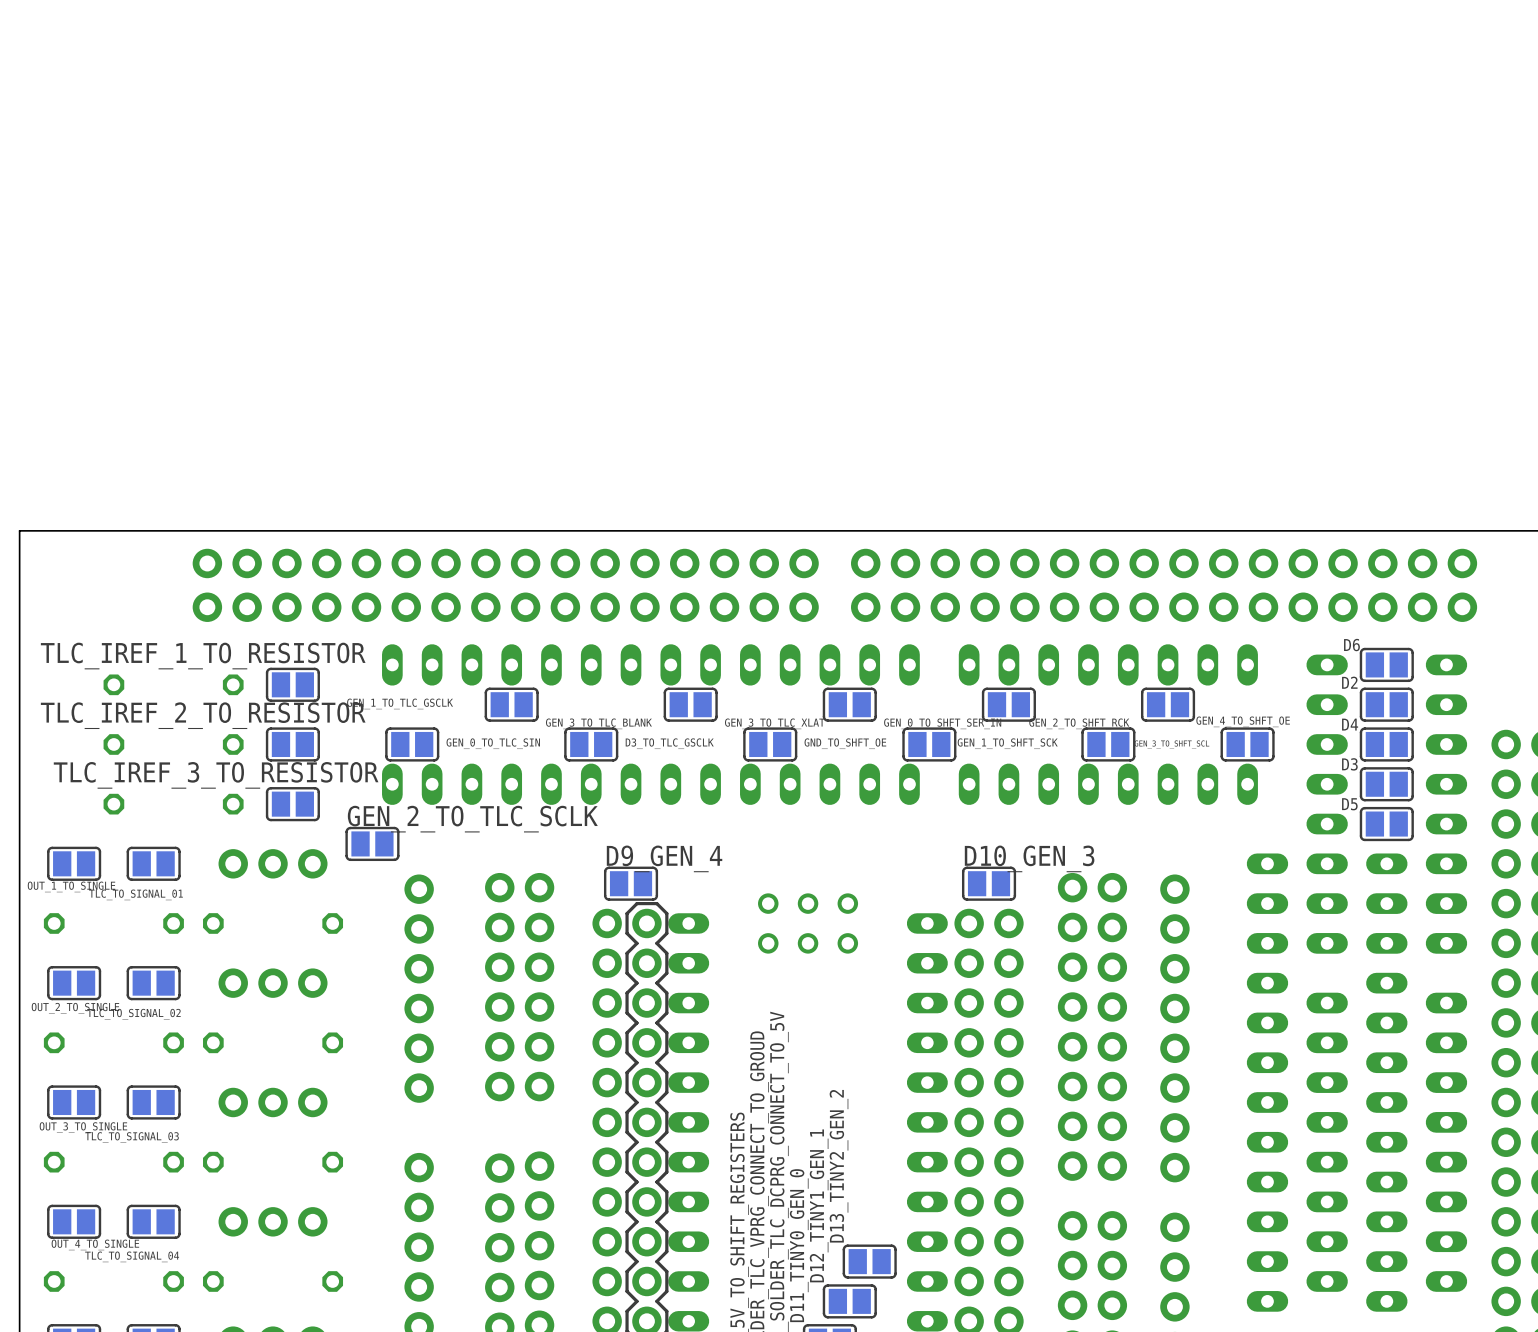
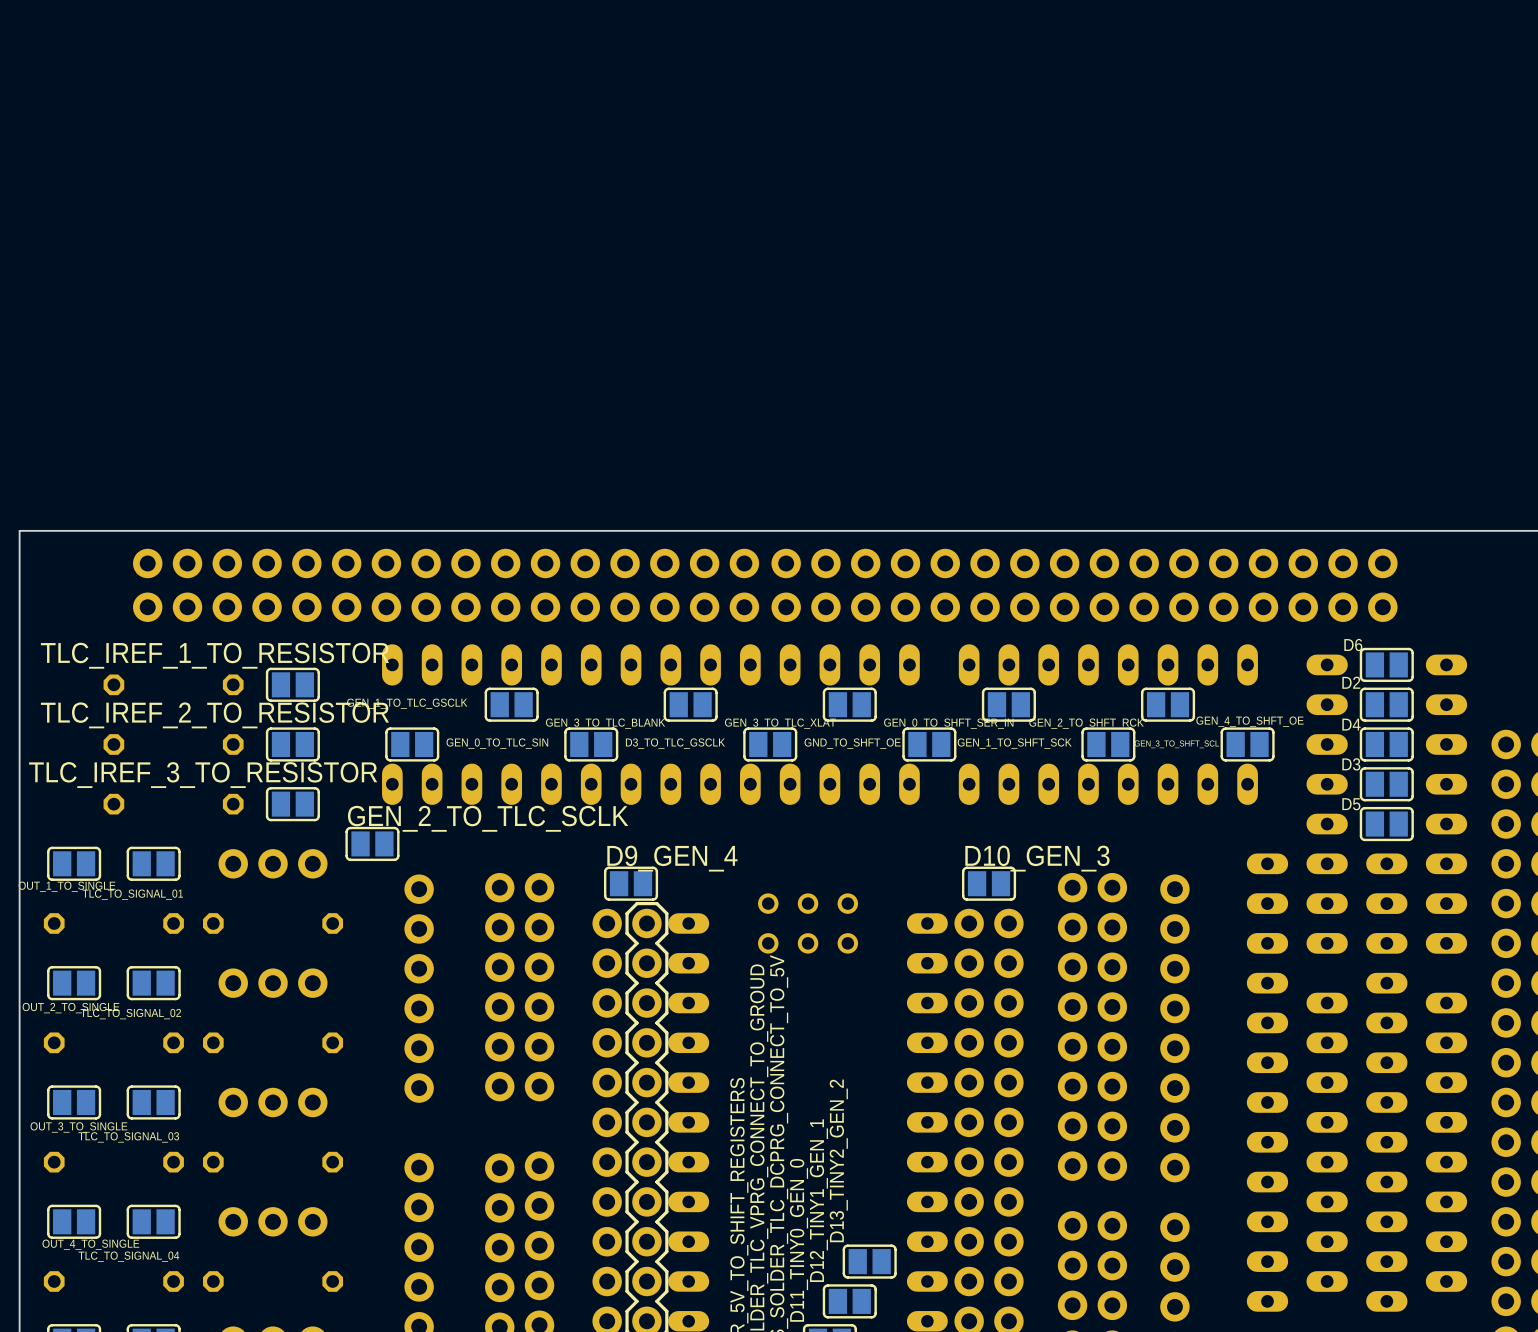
part: none -> (446, 563)
part: (505, 563) -> none
part: none -> (1084, 563)
part: (1164, 563) -> none
part: none -> (446, 607)
part: (505, 607) -> none
part: none -> (1084, 607)
part: (1164, 607) -> none

